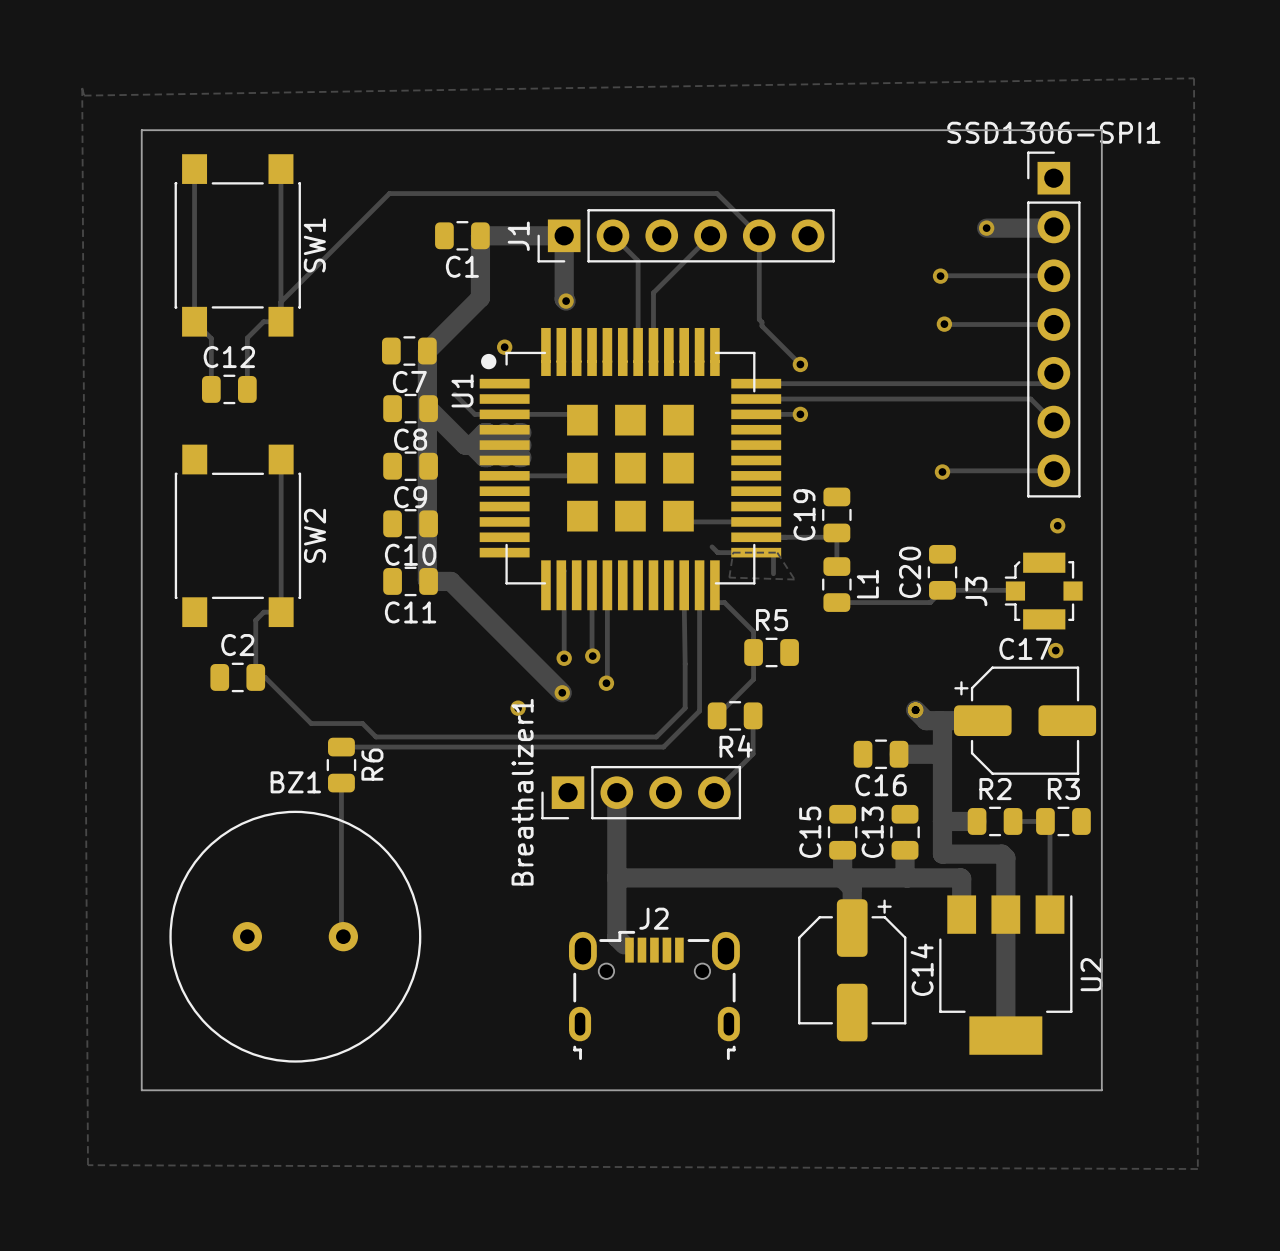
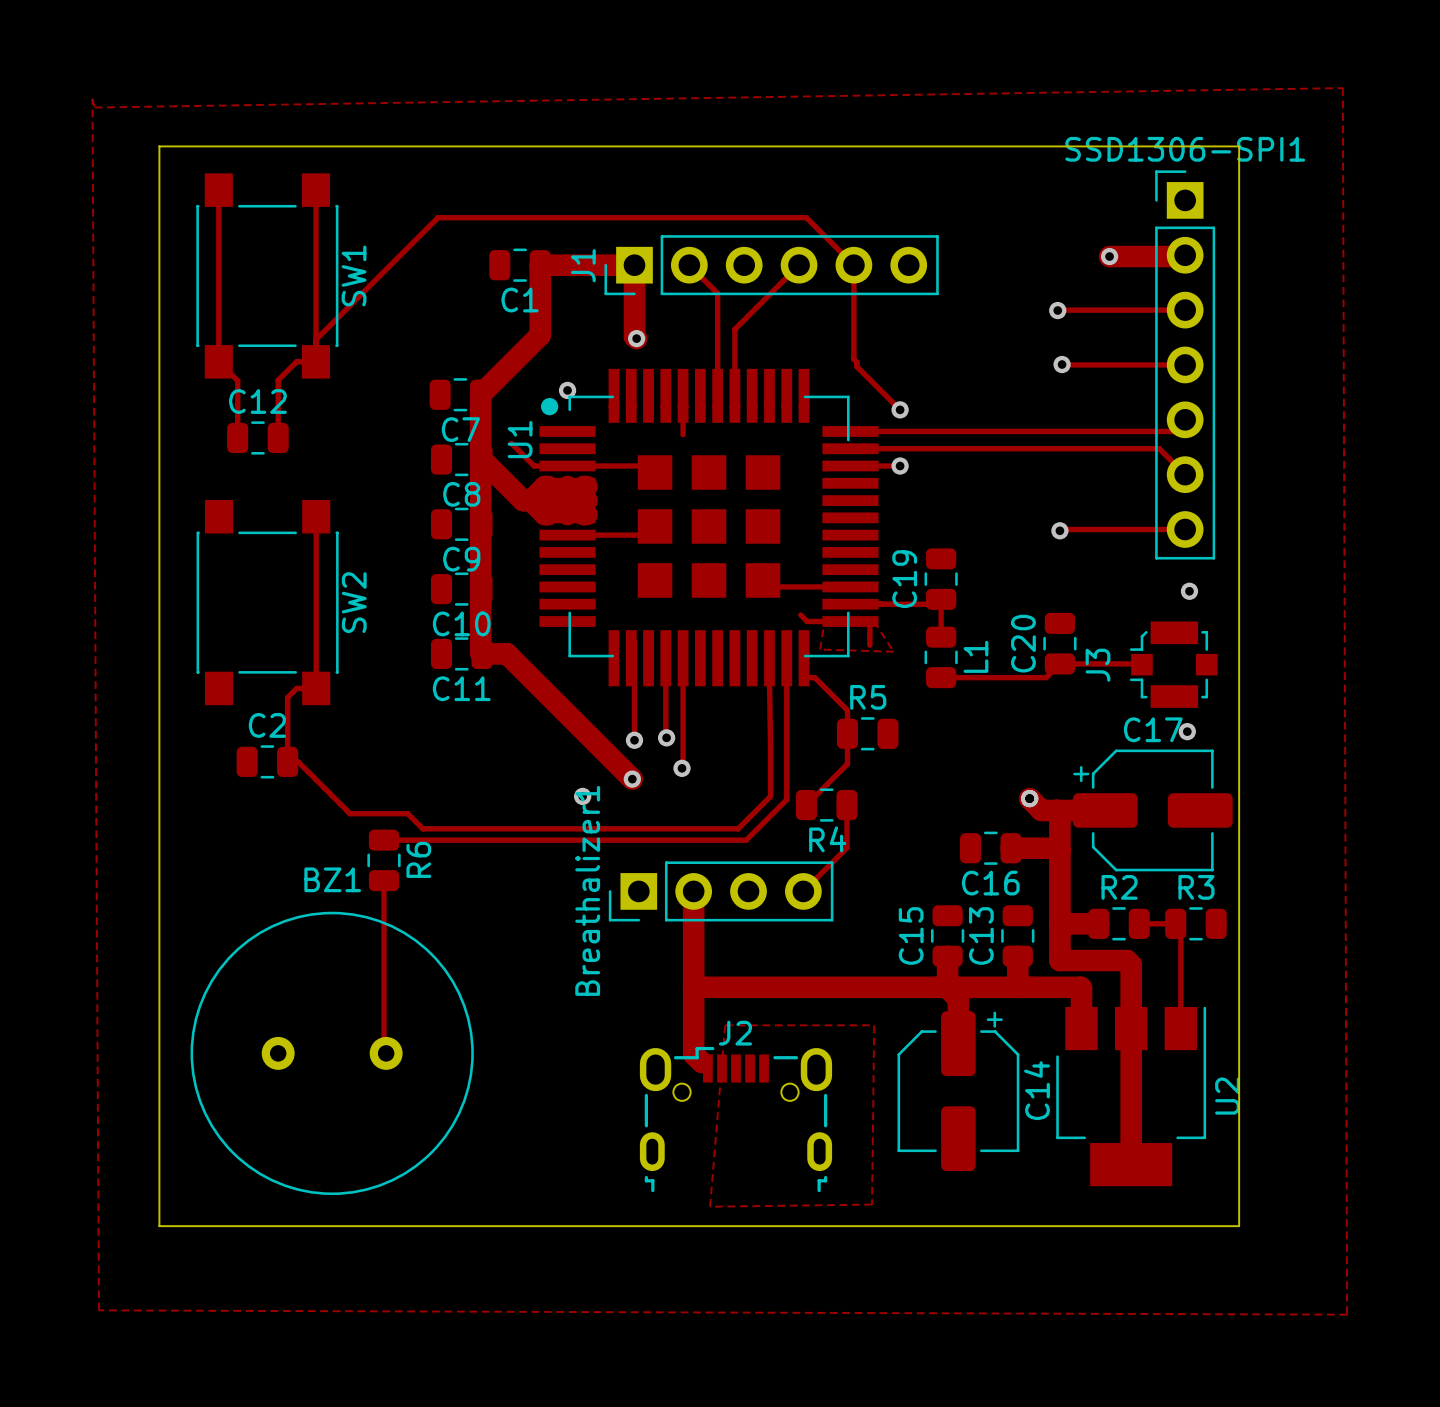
track: none -> (683, 414) (683, 434)
zone outline: none -> (725, 1025) (710, 1206) (872, 1204) (874, 1025) (725, 1025)

